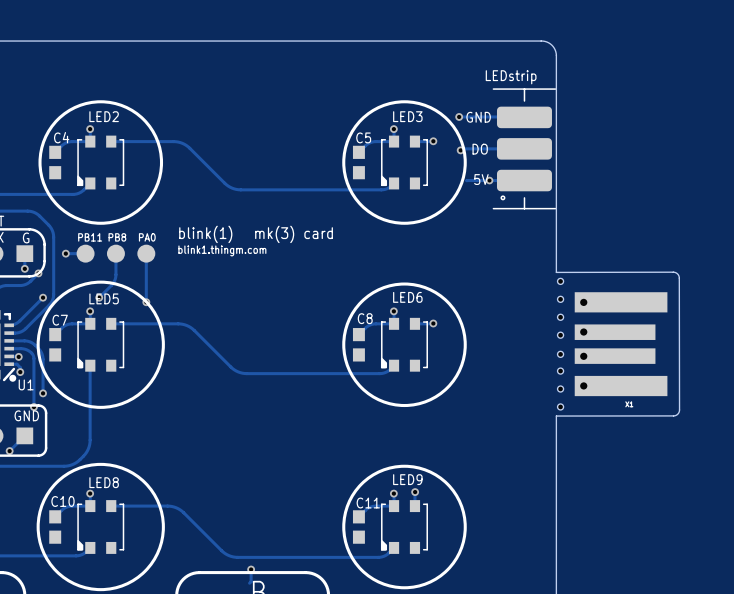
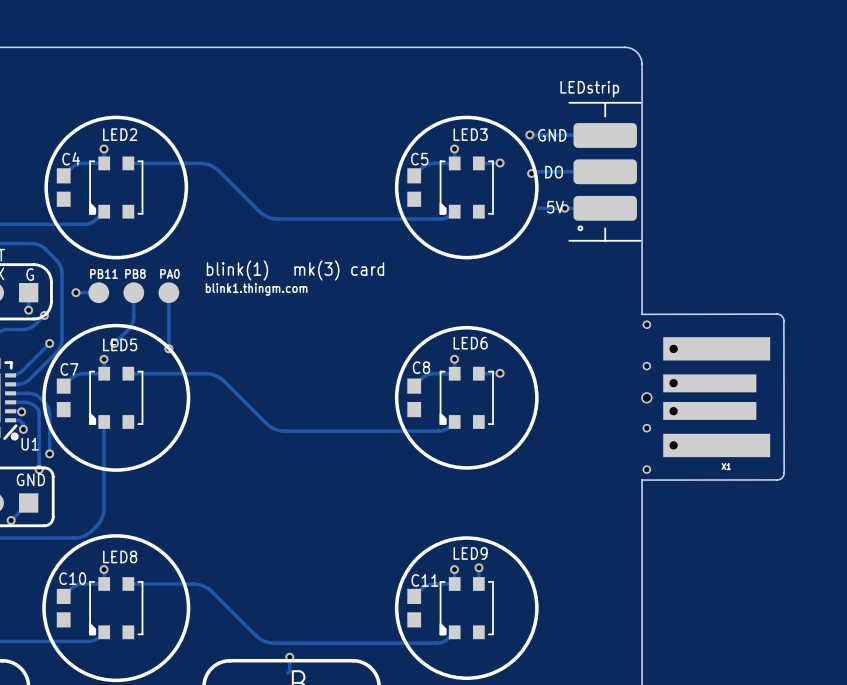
hole: (560, 299) -> none
hole: (560, 335) -> none
hole: none -> (646, 397)
hole: (560, 354) -> none
hole: (560, 389) -> none

